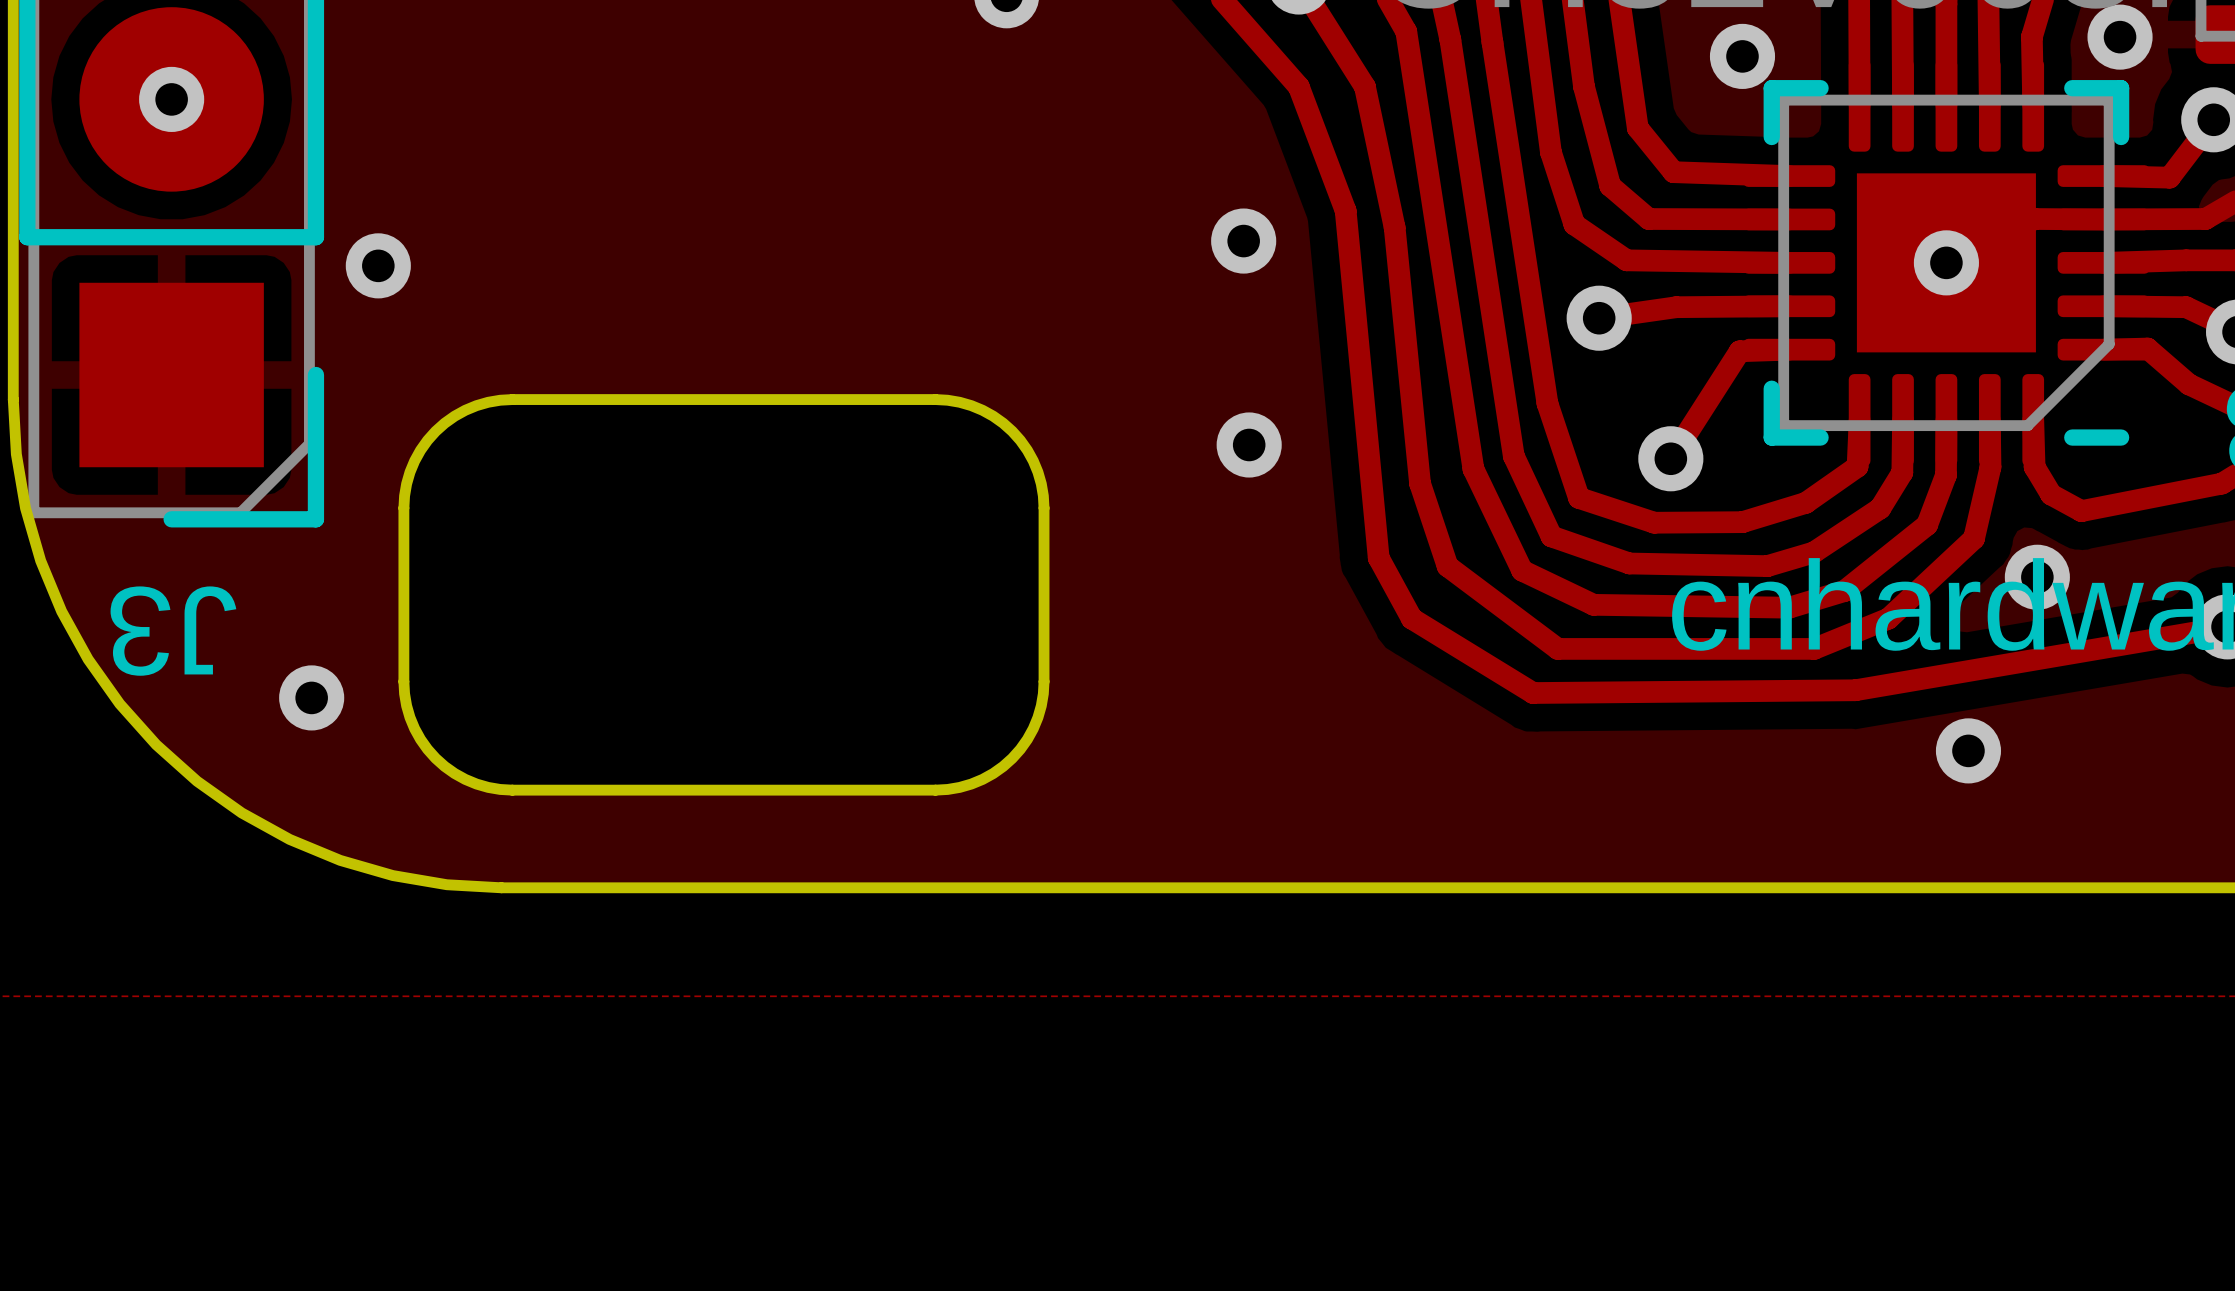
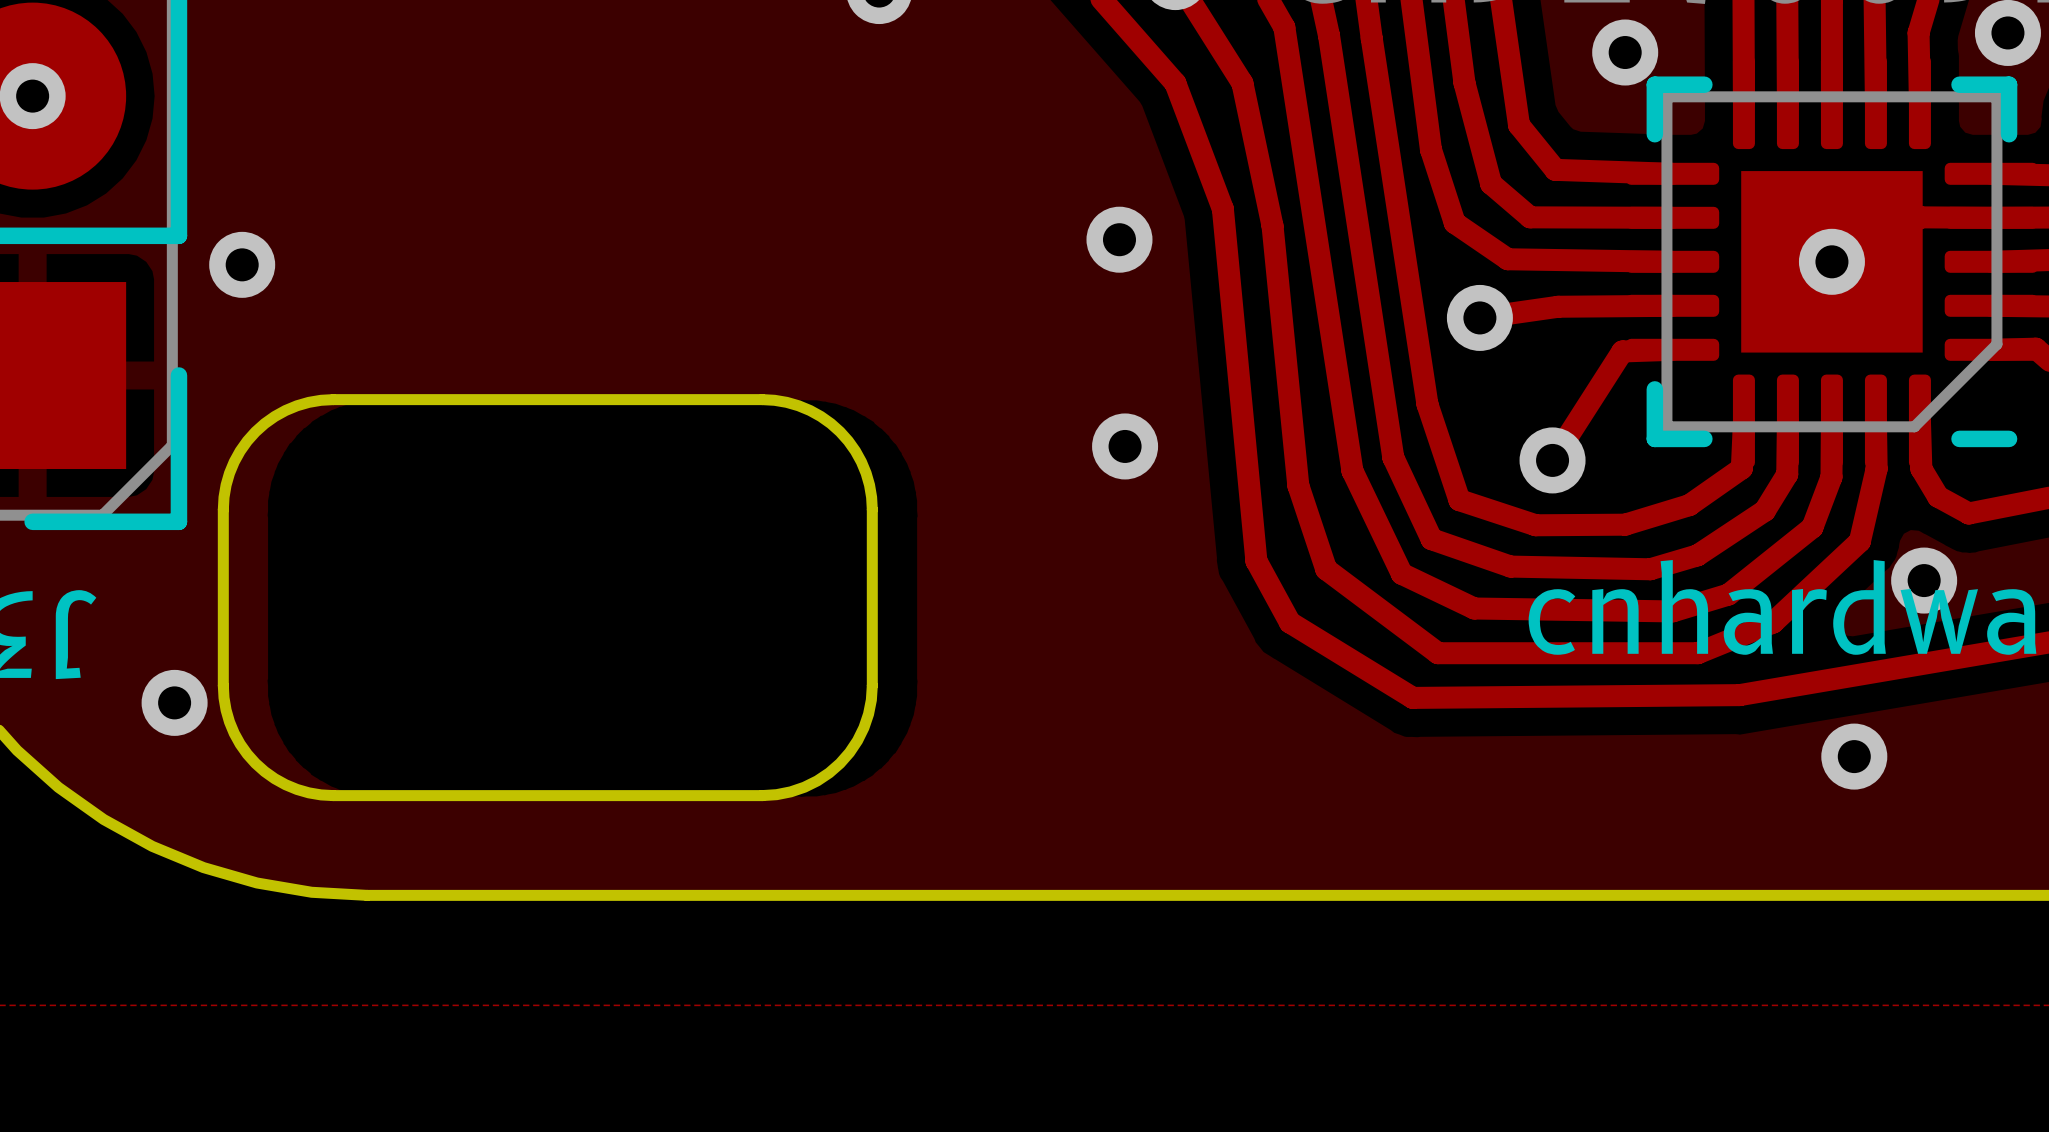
board edge: (512, 399) (935, 399) (971, 405) (993, 416) (1012, 431) (1027, 450) (1037, 472) (1043, 495) (1043, 693) (1037, 717) (1027, 739) (1012, 758) (993, 773) (971, 784) (947, 789) (512, 790) (476, 784) (454, 773) (427, 749) (414, 728) (406, 705) (403, 681) (404, 495) (409, 472) (420, 450) (444, 423) (476, 405) (512, 399) -> (333, 399) (296, 405) (264, 423) (240, 451) (229, 473) (224, 497) (223, 685) (226, 710) (234, 733) (247, 754) (274, 778) (296, 789) (333, 795) (762, 795) (790, 791) (817, 780) (840, 763) (857, 740) (868, 714) (872, 685) (871, 497) (866, 473) (855, 451) (840, 431) (820, 416) (798, 405) (762, 399) (333, 399)

